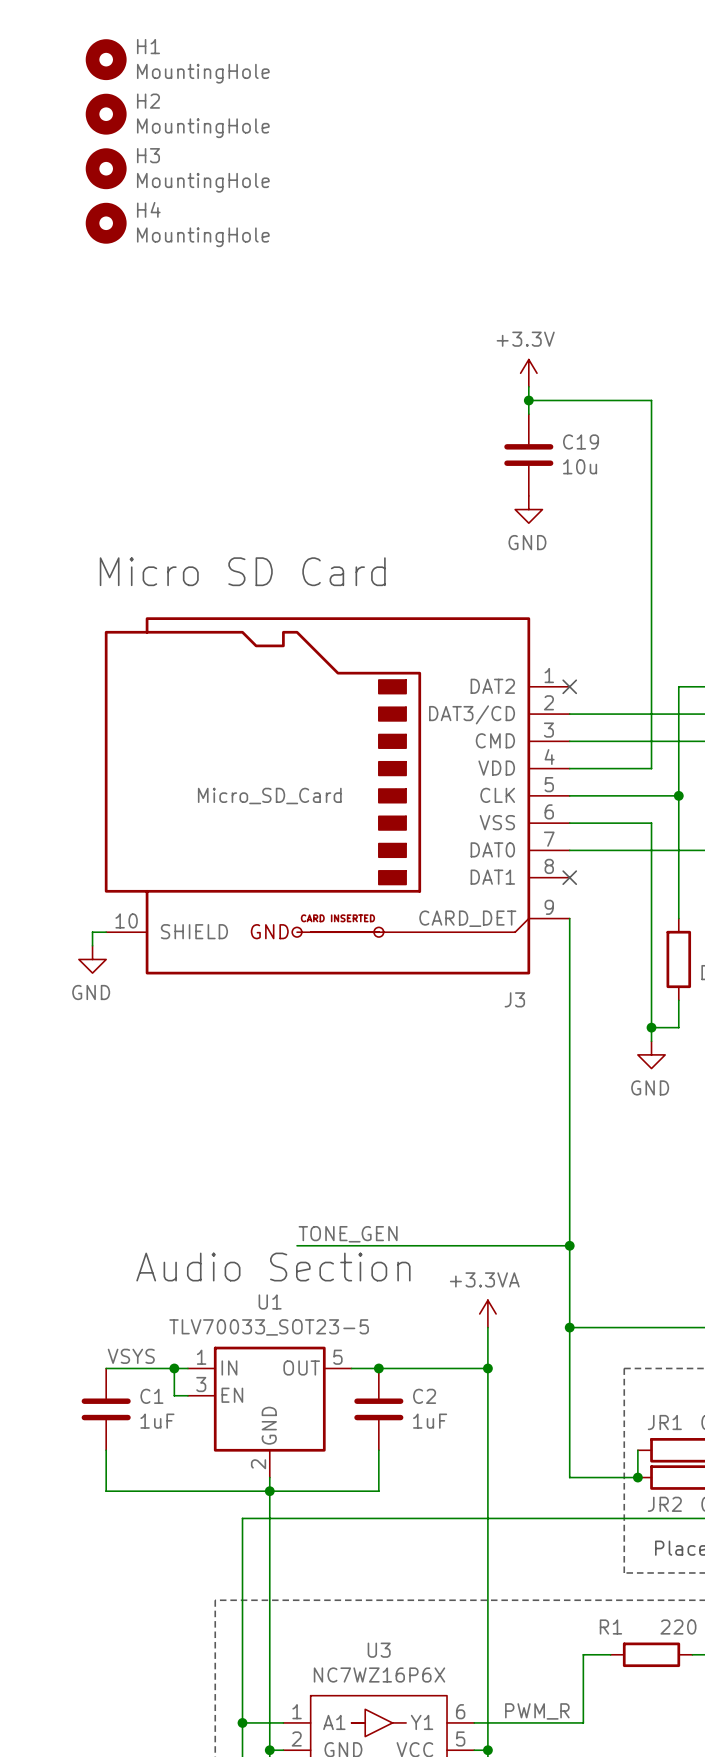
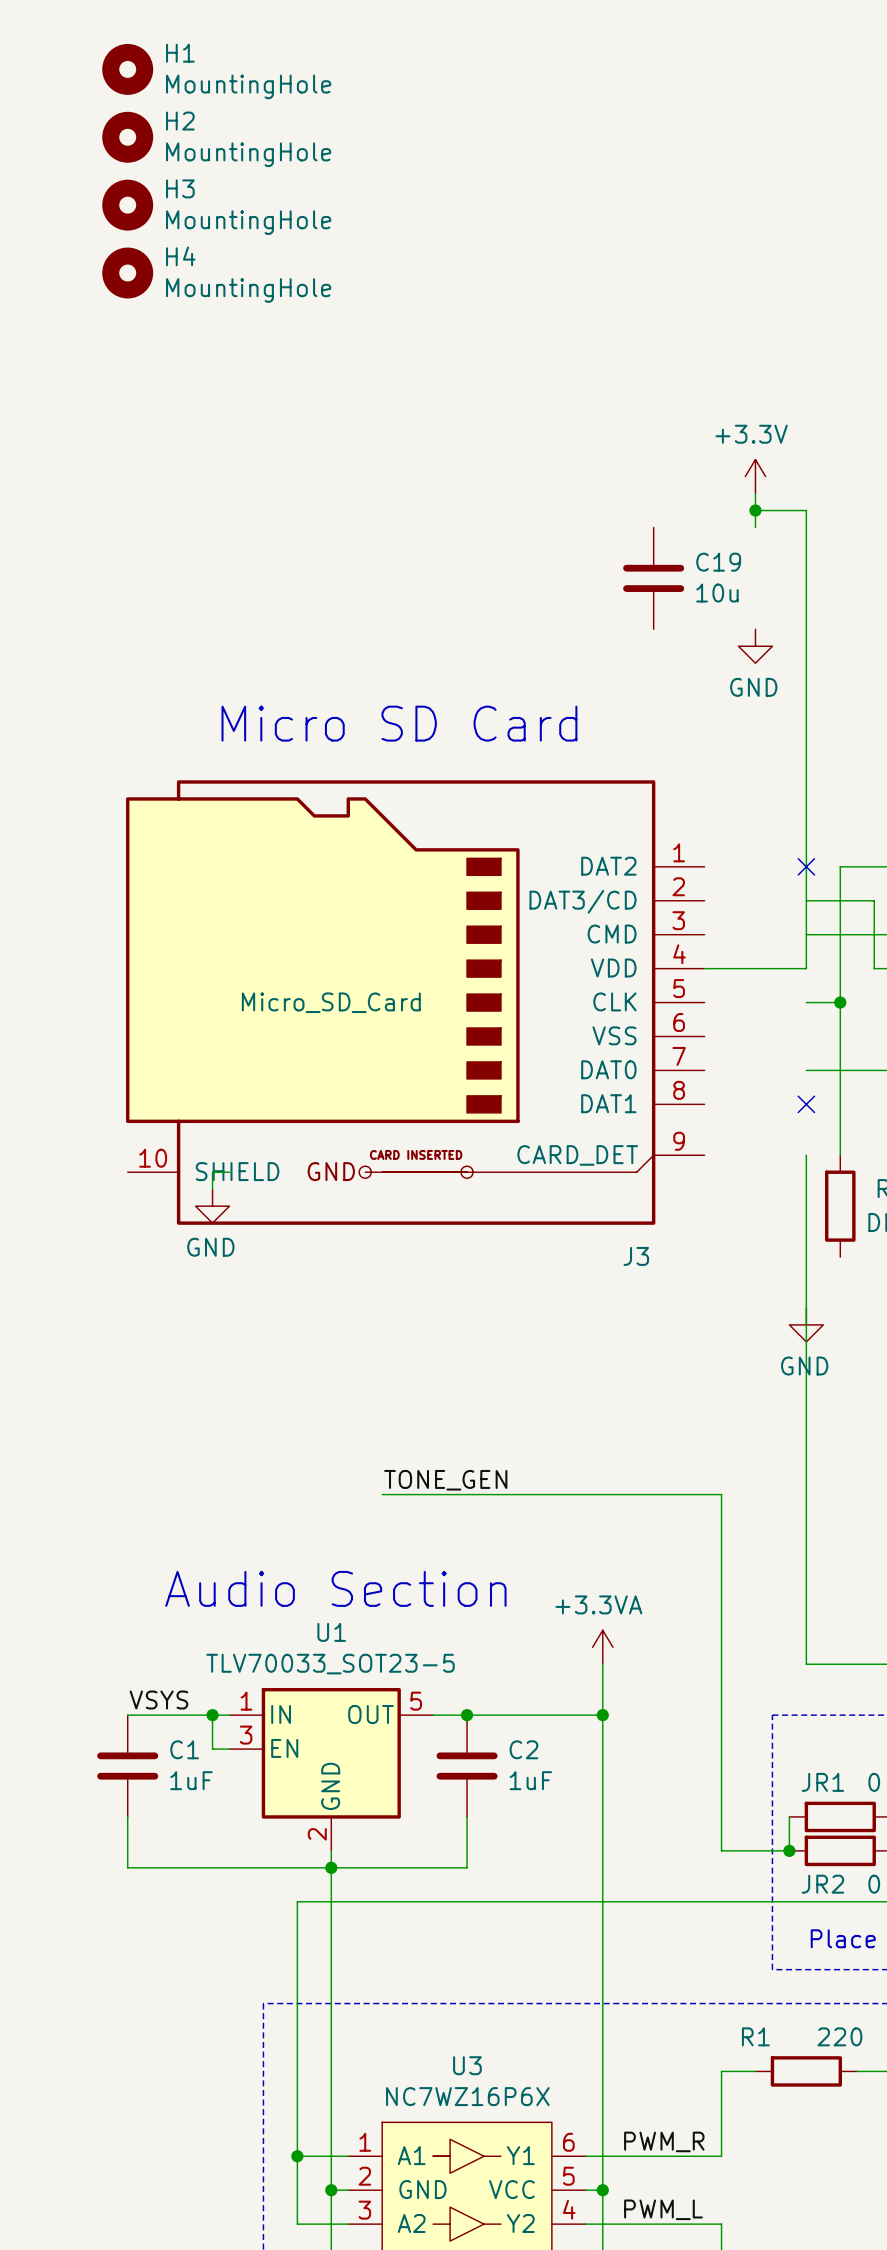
H1 position: (106, 59) -> (127, 69)
H2 position: (106, 114) -> (127, 137)
H3 position: (106, 168) -> (127, 205)
H4 position: (106, 223) -> (127, 273)
power symbol position: +3.3V (528, 373) -> +3.3V (755, 476)
wire: (528, 386) (528, 414) -> (755, 493) (755, 527)
wire: (528, 400) (610, 400) -> none
junction: (528, 400) -> none
junction: none -> (755, 510)
power symbol position: GND (528, 509) -> GND (755, 646)
text position: Micro SD Card (242, 571) -> Micro SD Card (399, 723)
no-connect mark: (569, 686) -> none
no-connect mark: none -> (806, 866)
wire: (569, 714) (651, 714) -> none
wire: (569, 741) (651, 741) -> none
wire: (569, 795) (651, 795) -> none
wire: (569, 823) (651, 823) (651, 918) -> none
wire: (569, 850) (651, 850) -> none
no-connect mark: (569, 877) -> none
no-connect mark: none -> (806, 1104)
wire: (569, 918) (569, 1477) (583, 1477) -> (382, 1494) (721, 1494) (721, 1850)
wire: (106, 932) (92, 932) (92, 945) -> (229, 1172) (212, 1172) (212, 1189)
power symbol position: GND (92, 959) -> GND (212, 1206)
wire: (678, 1000) (678, 1027) (651, 1027) -> none
junction: (651, 1027) -> none
label position: TONE_GEN (348, 1234) -> TONE_GEN (445, 1480)
wire: (297, 1245) (569, 1245) -> none
junction: (569, 1245) -> none
wire: (569, 1327) (651, 1327) -> (806, 1307) (806, 1664)
junction: (569, 1327) -> none

